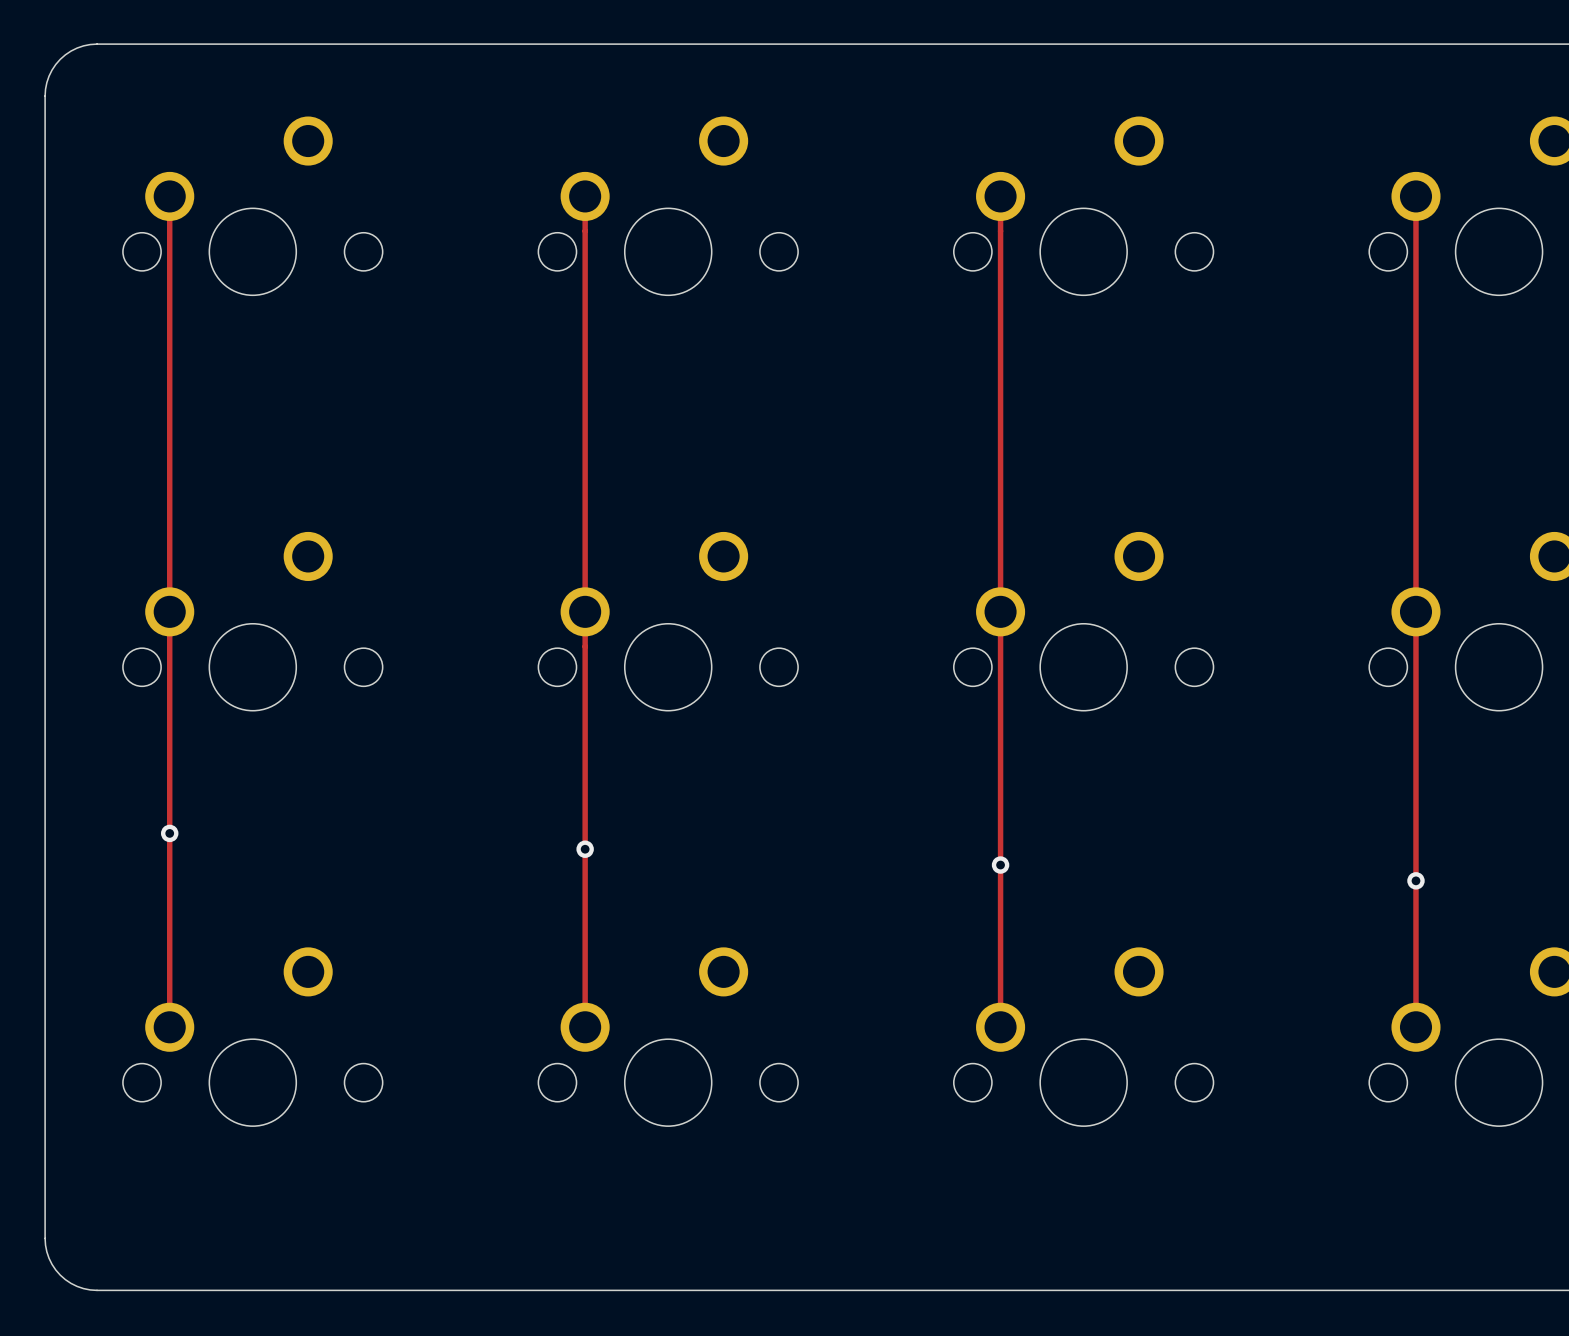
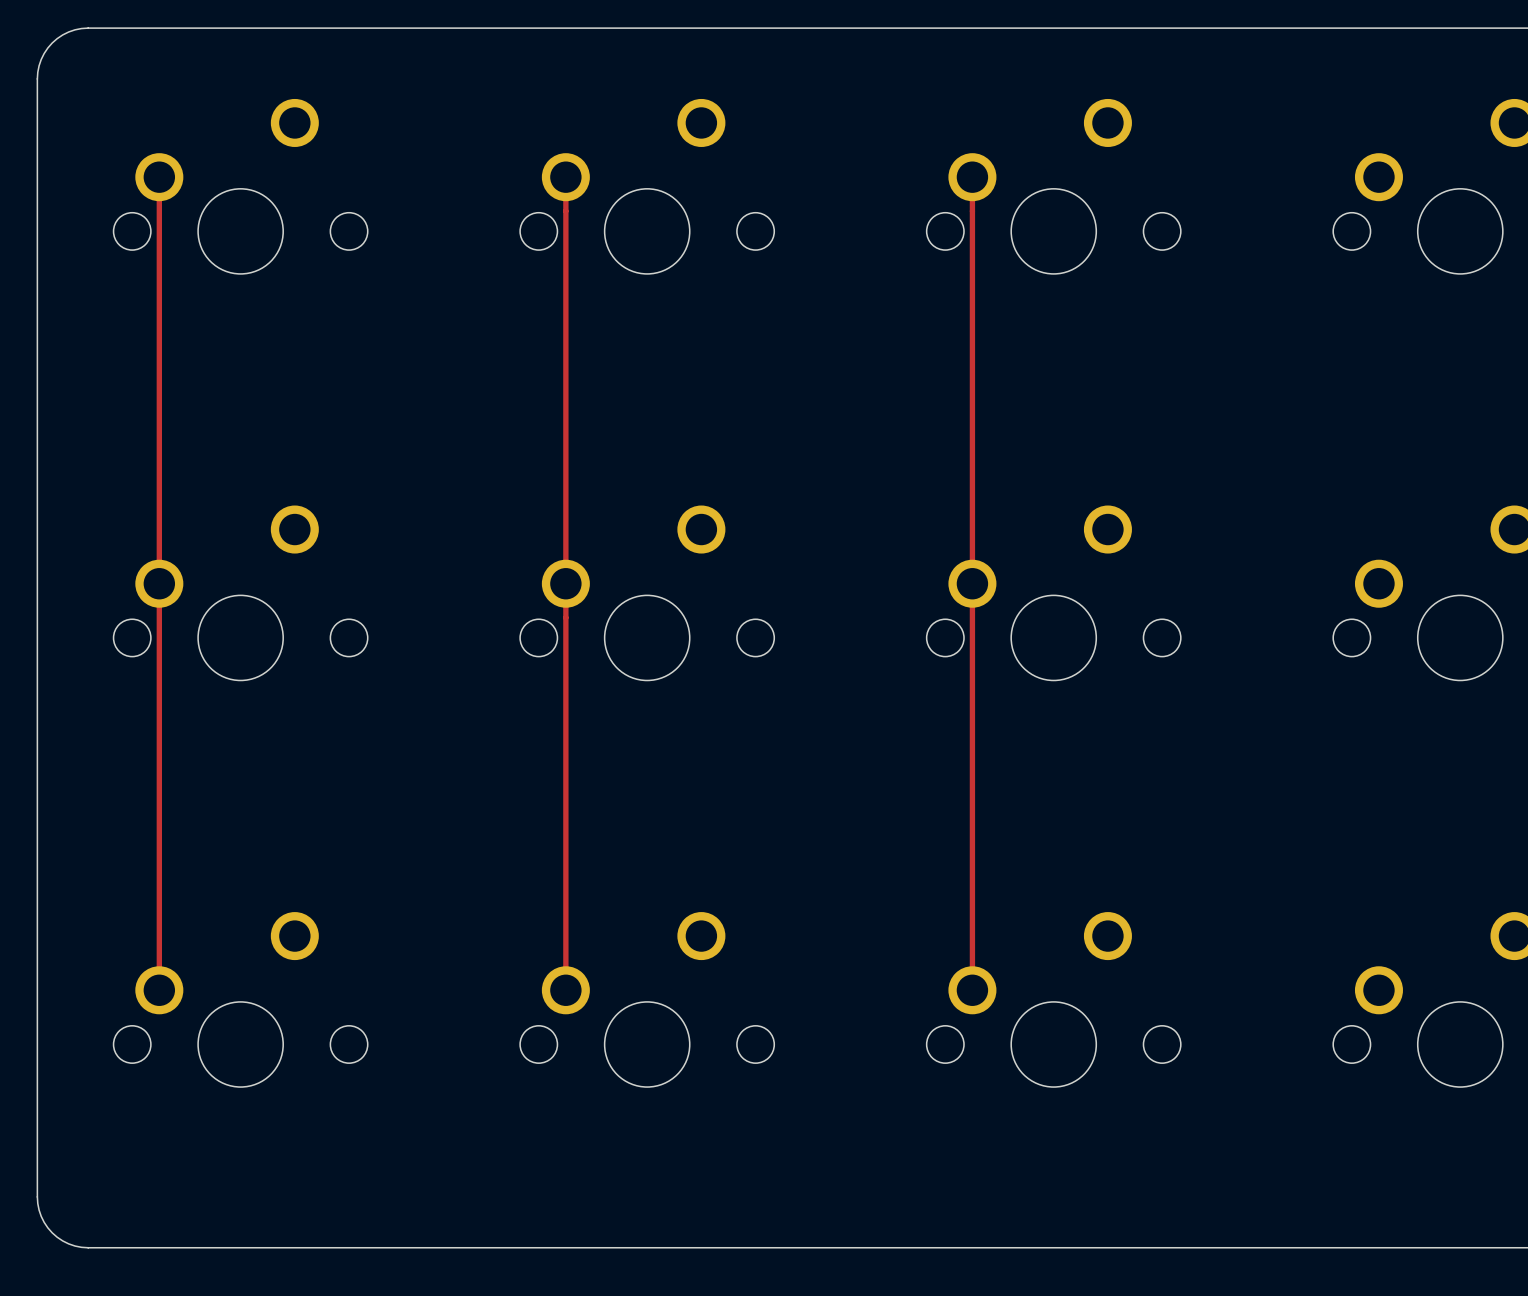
track: (1415, 196) (1415, 1027) -> none
via: (169, 833) -> none
via: (585, 849) -> none
via: (1000, 865) -> none
via: (1415, 880) -> none

